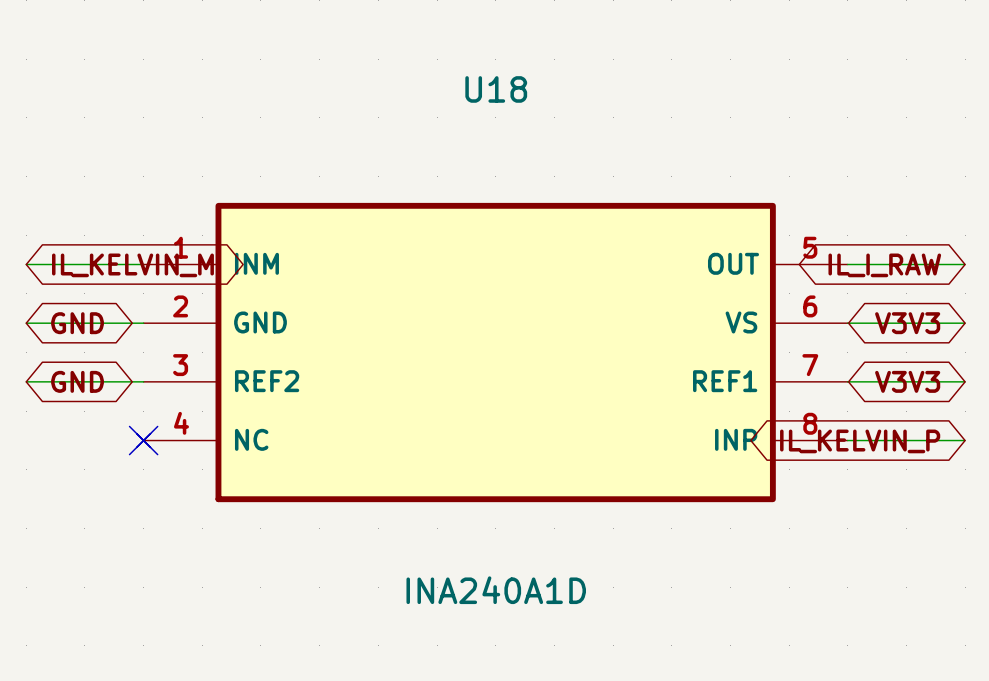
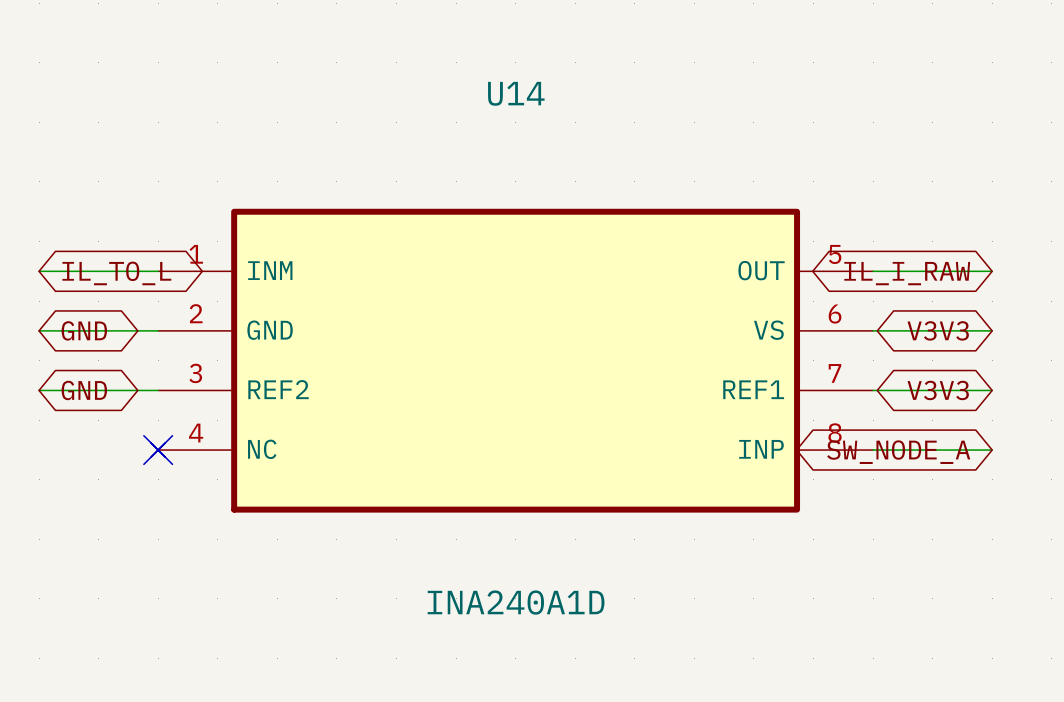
U18 name: U18 (496, 89) -> U14 (516, 93)
global label: IL_KELVIN_M (132, 265) -> IL_TO_L (116, 273)
global label: IL_KELVIN_P (860, 441) -> SW_NODE_A (898, 452)

